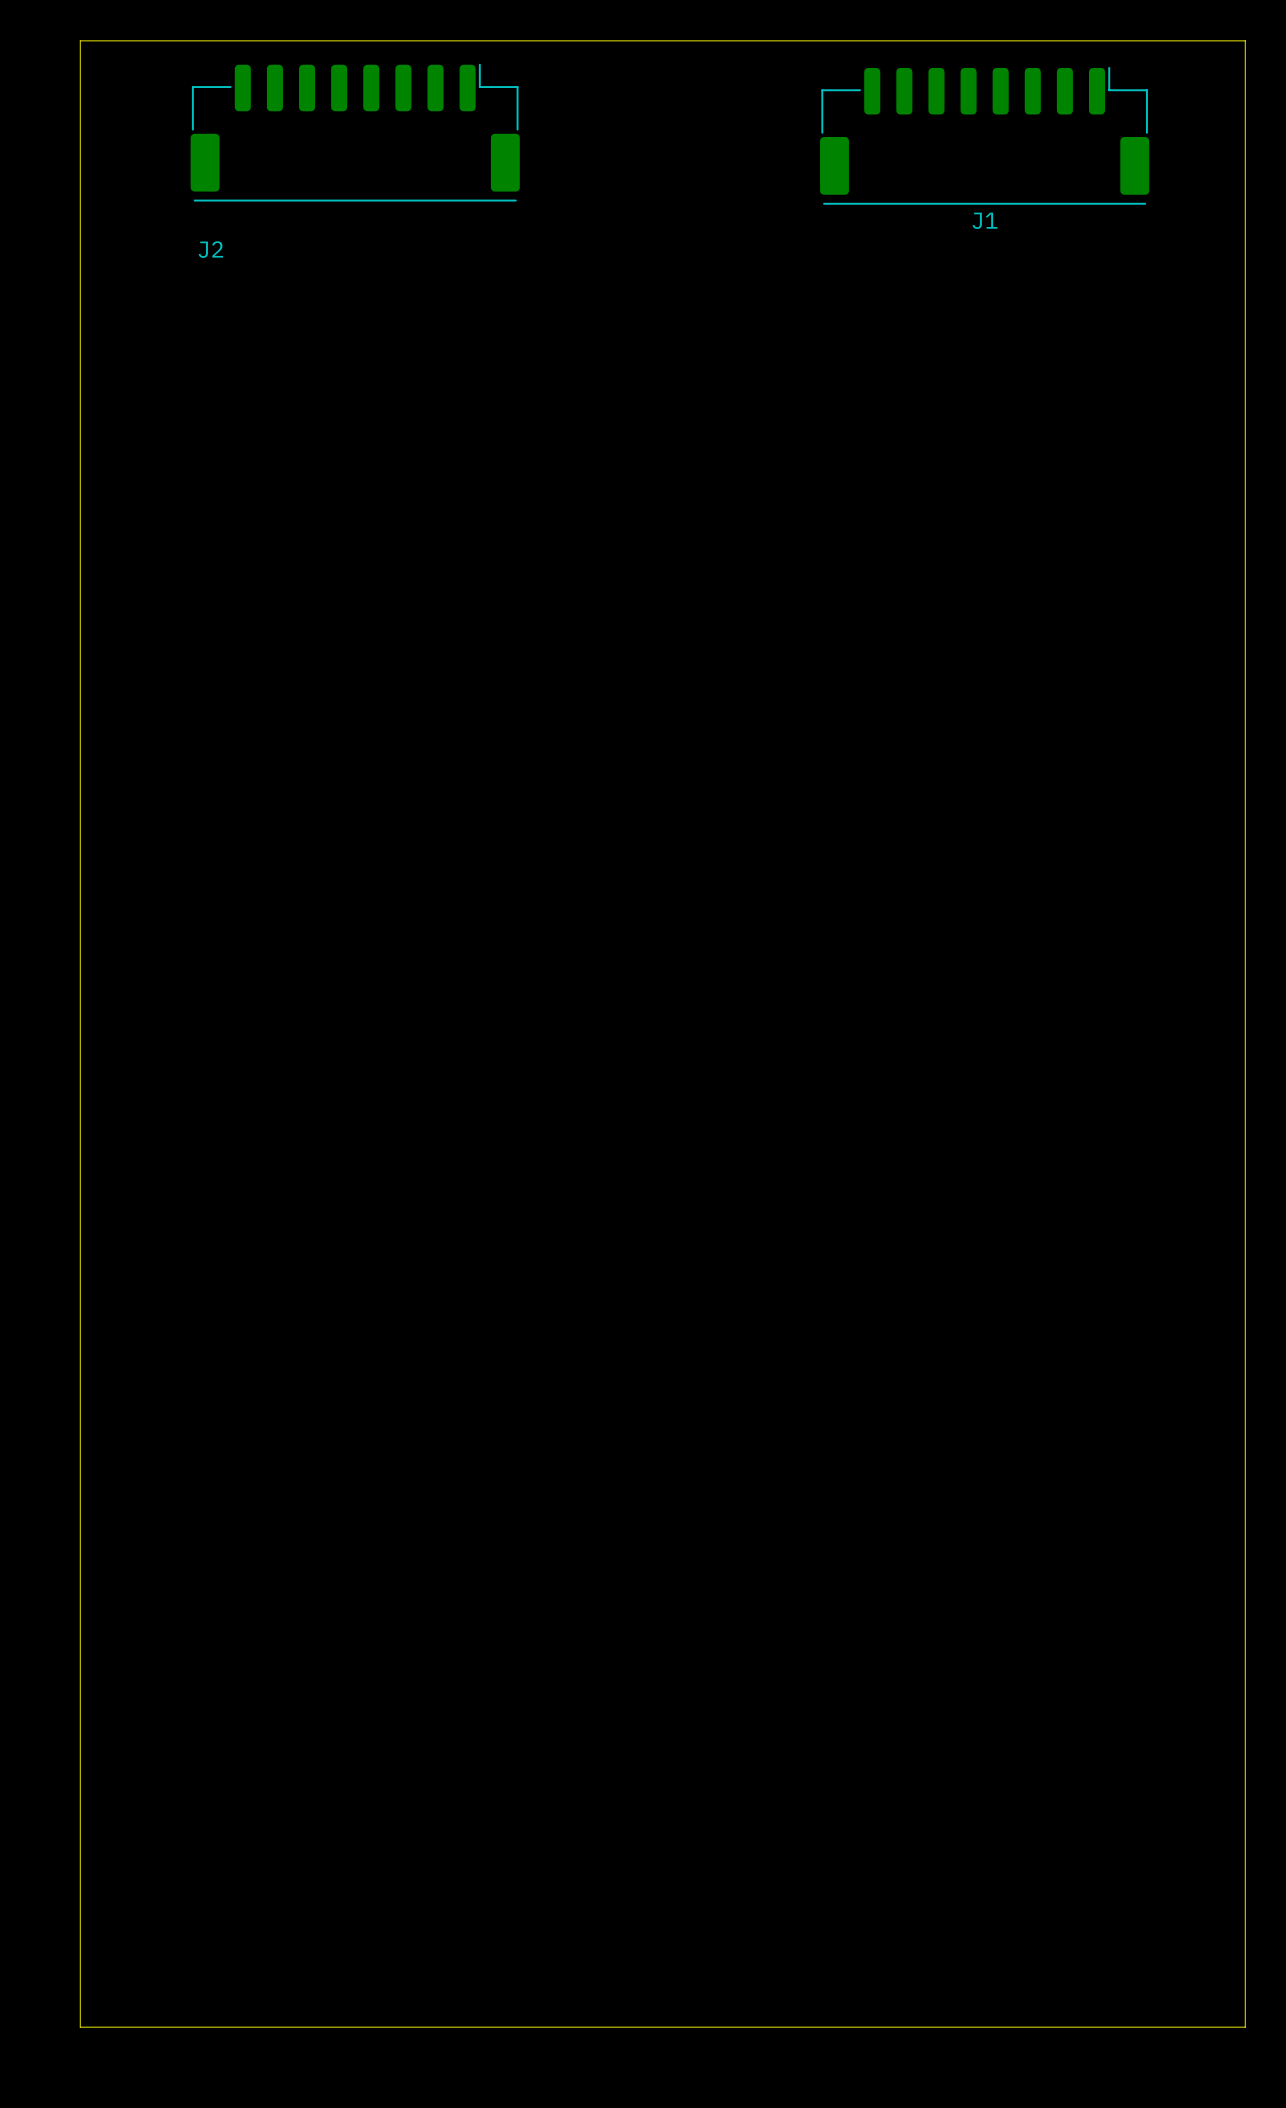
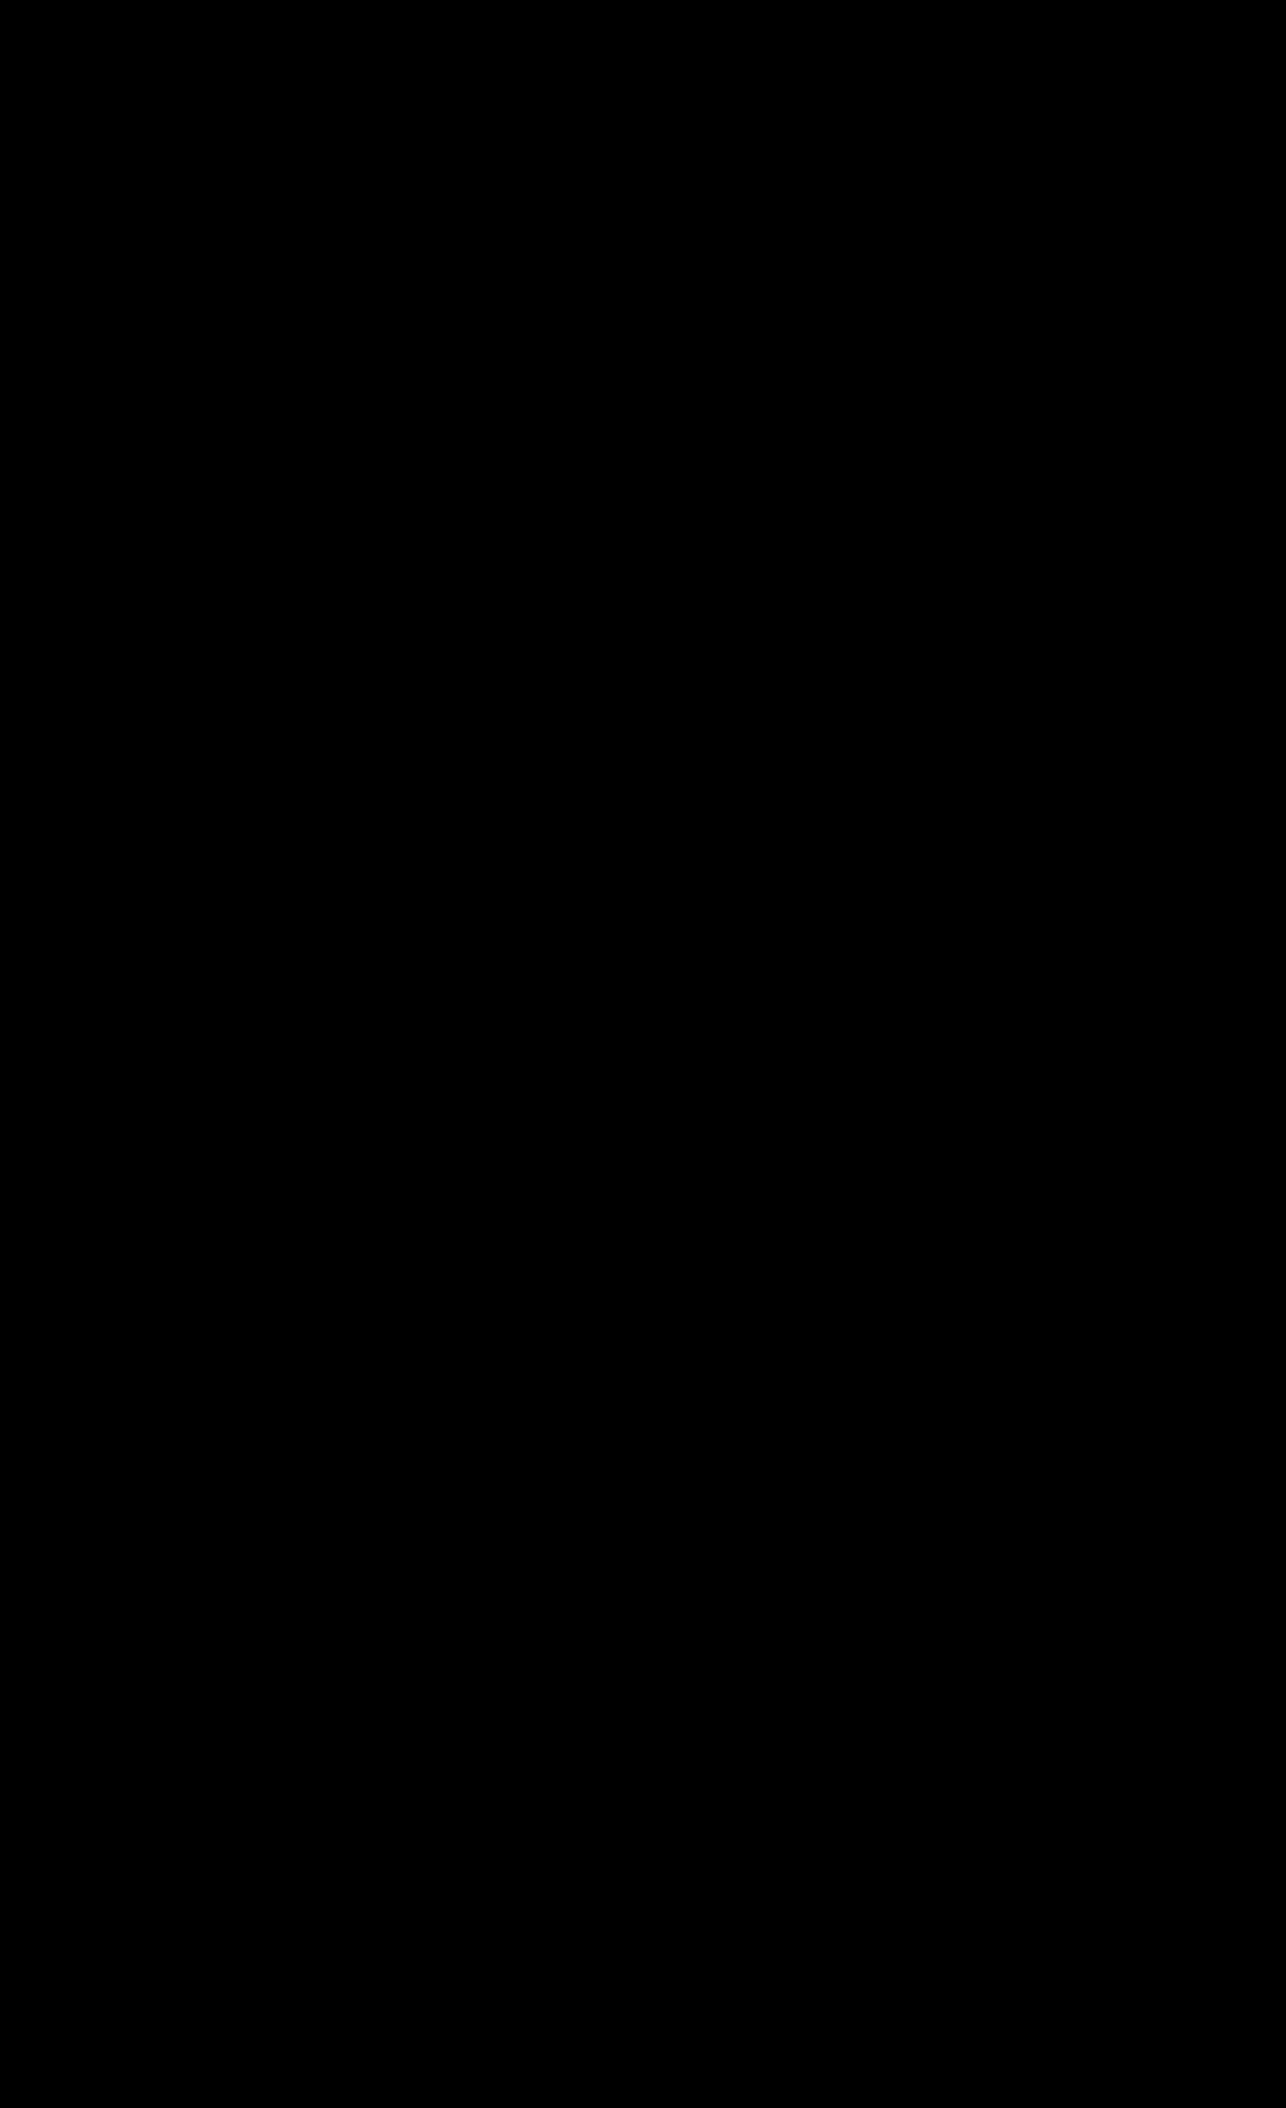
board edge: (1245, 40) (80, 40) (80, 2027) (1245, 2027) (1245, 40) -> none
J2: (355, 132) -> none
J1: (984, 135) -> none

